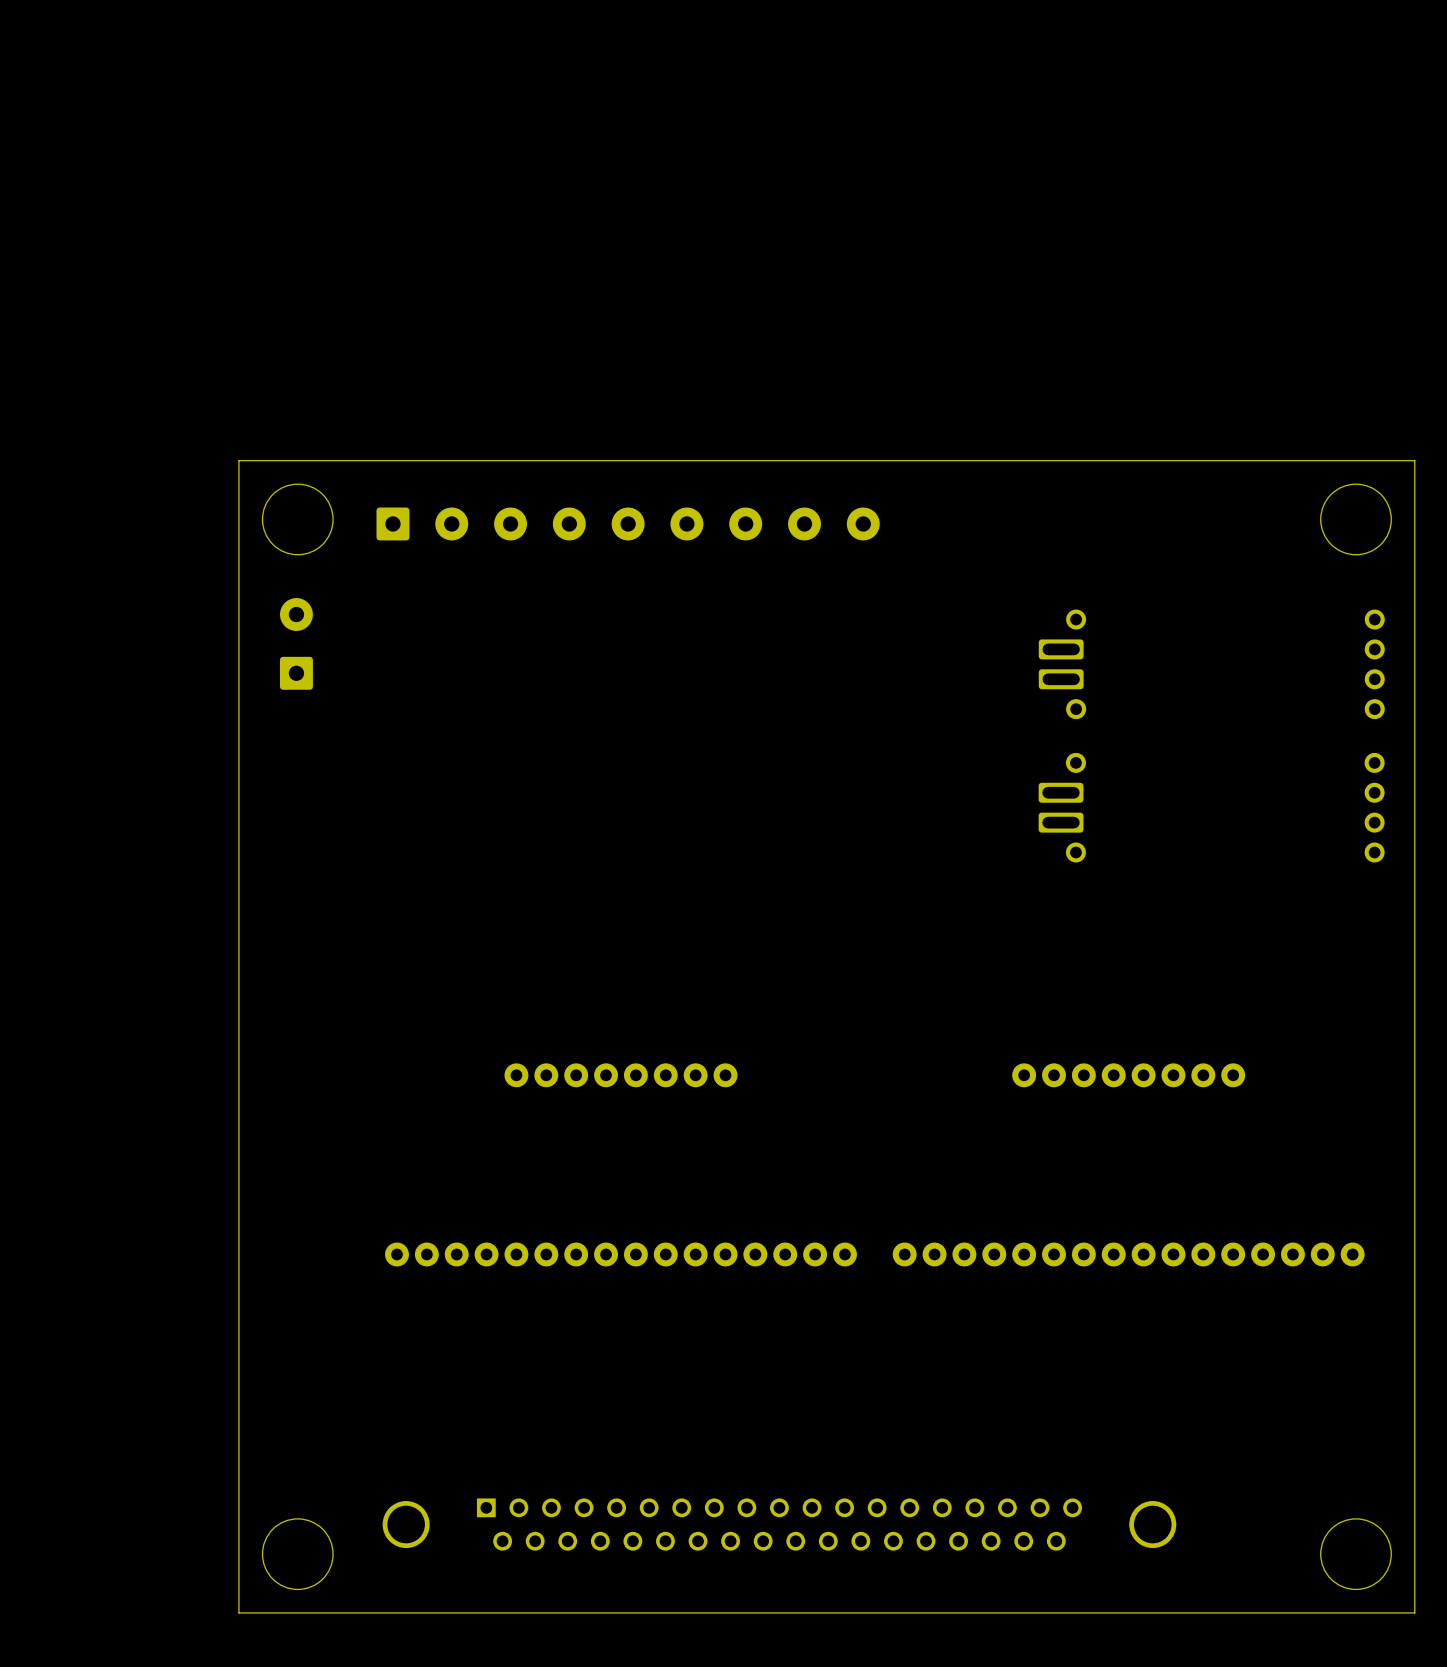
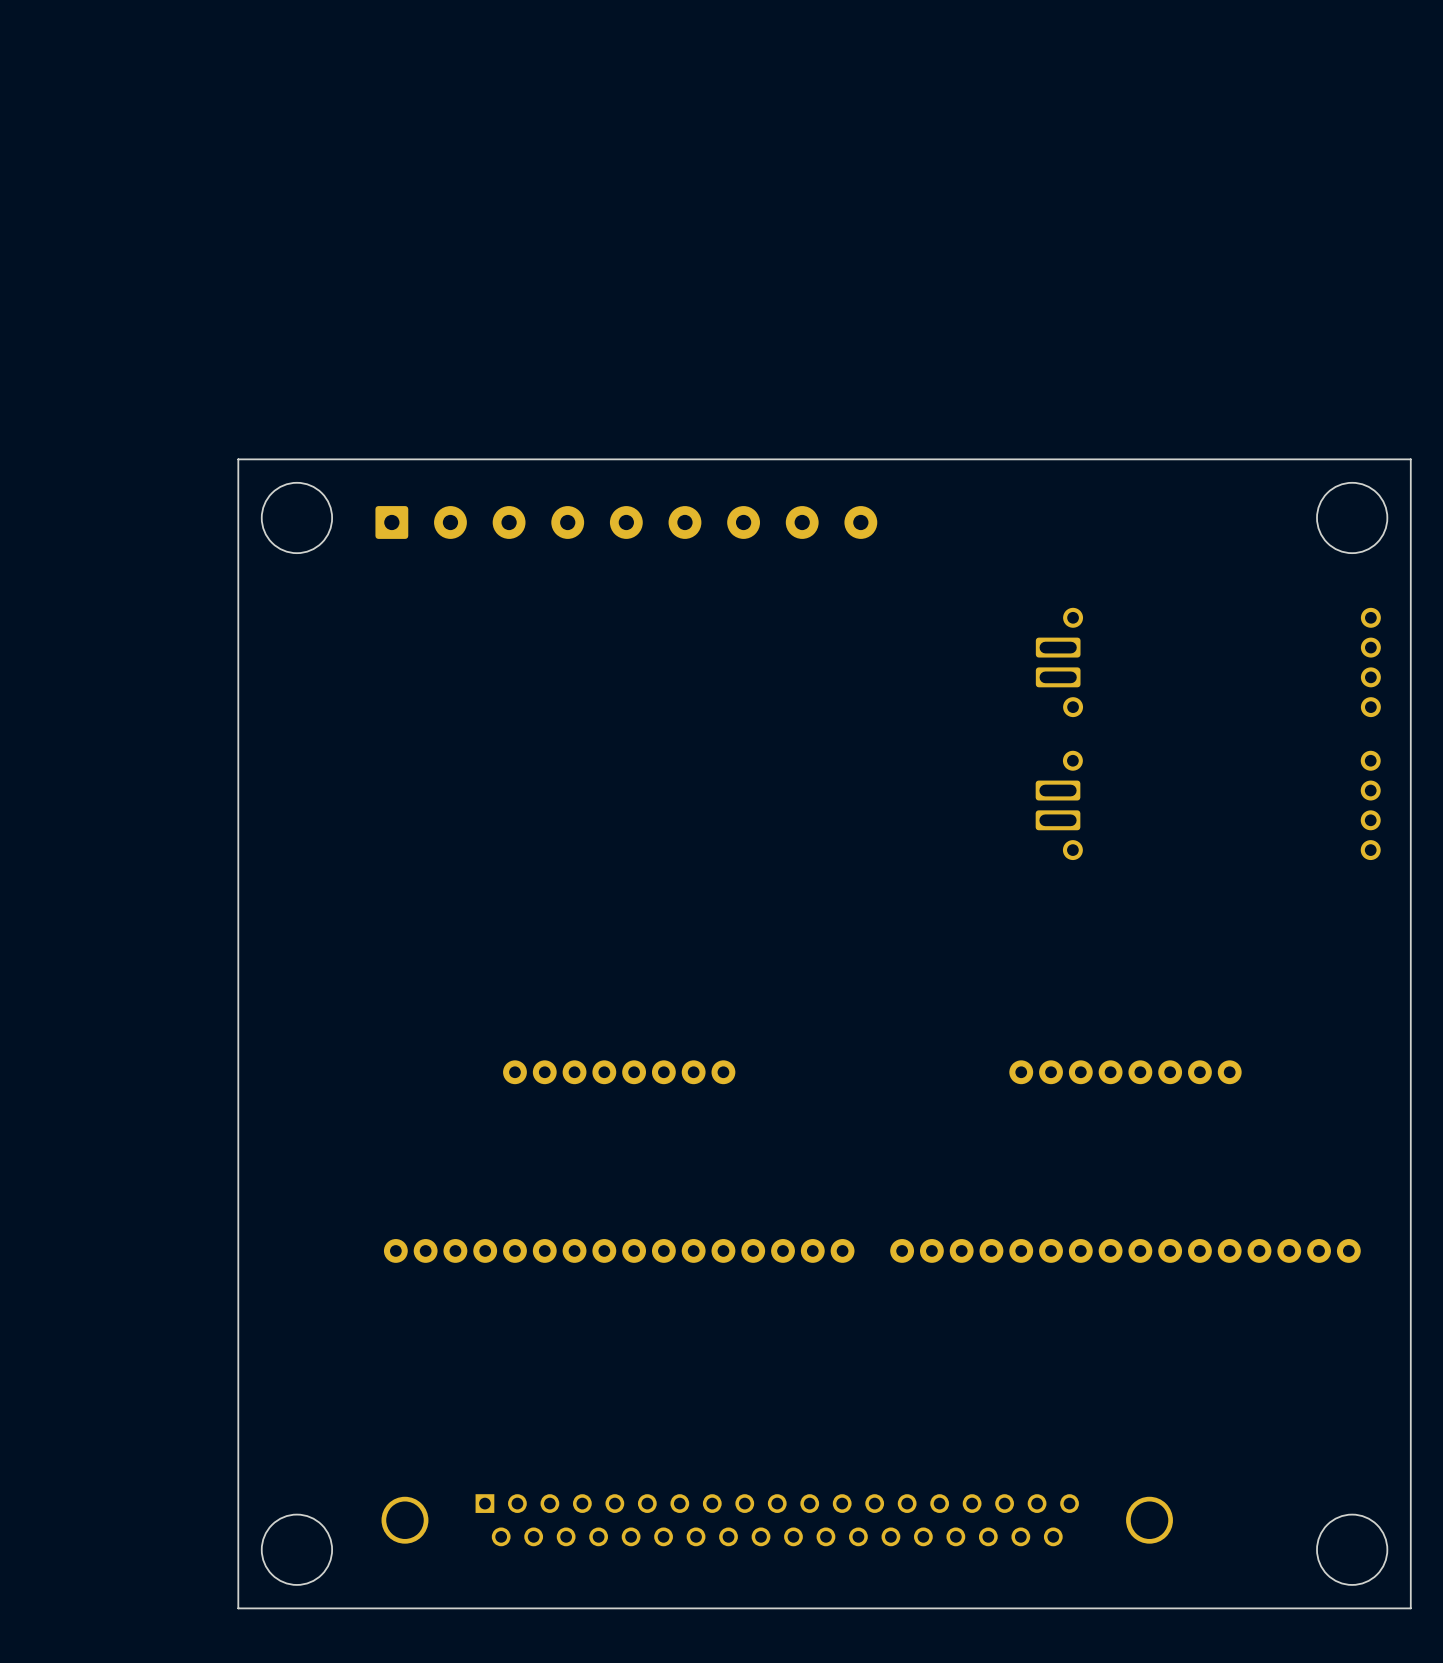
part: (296, 643) -> none

